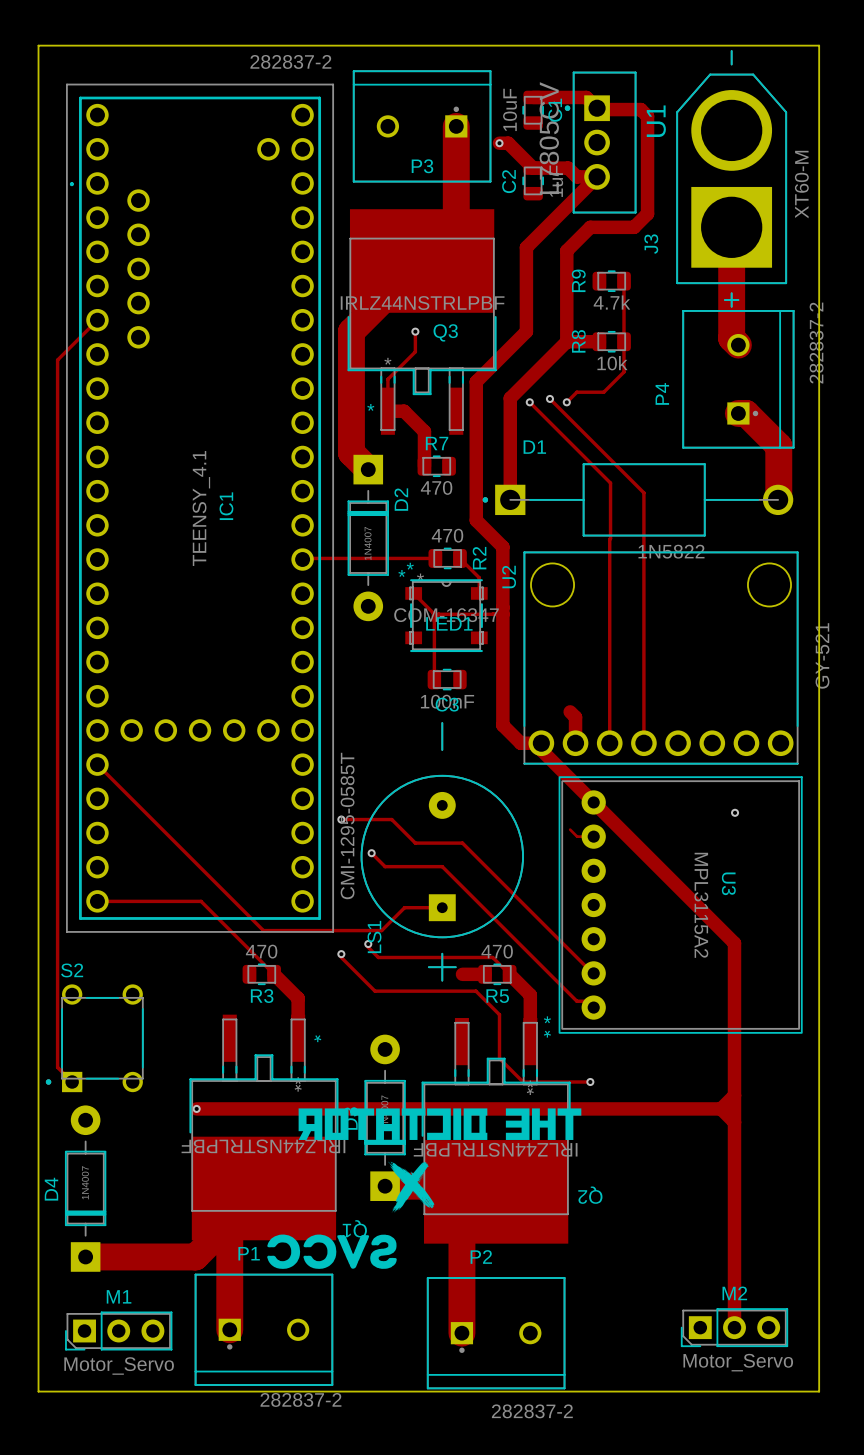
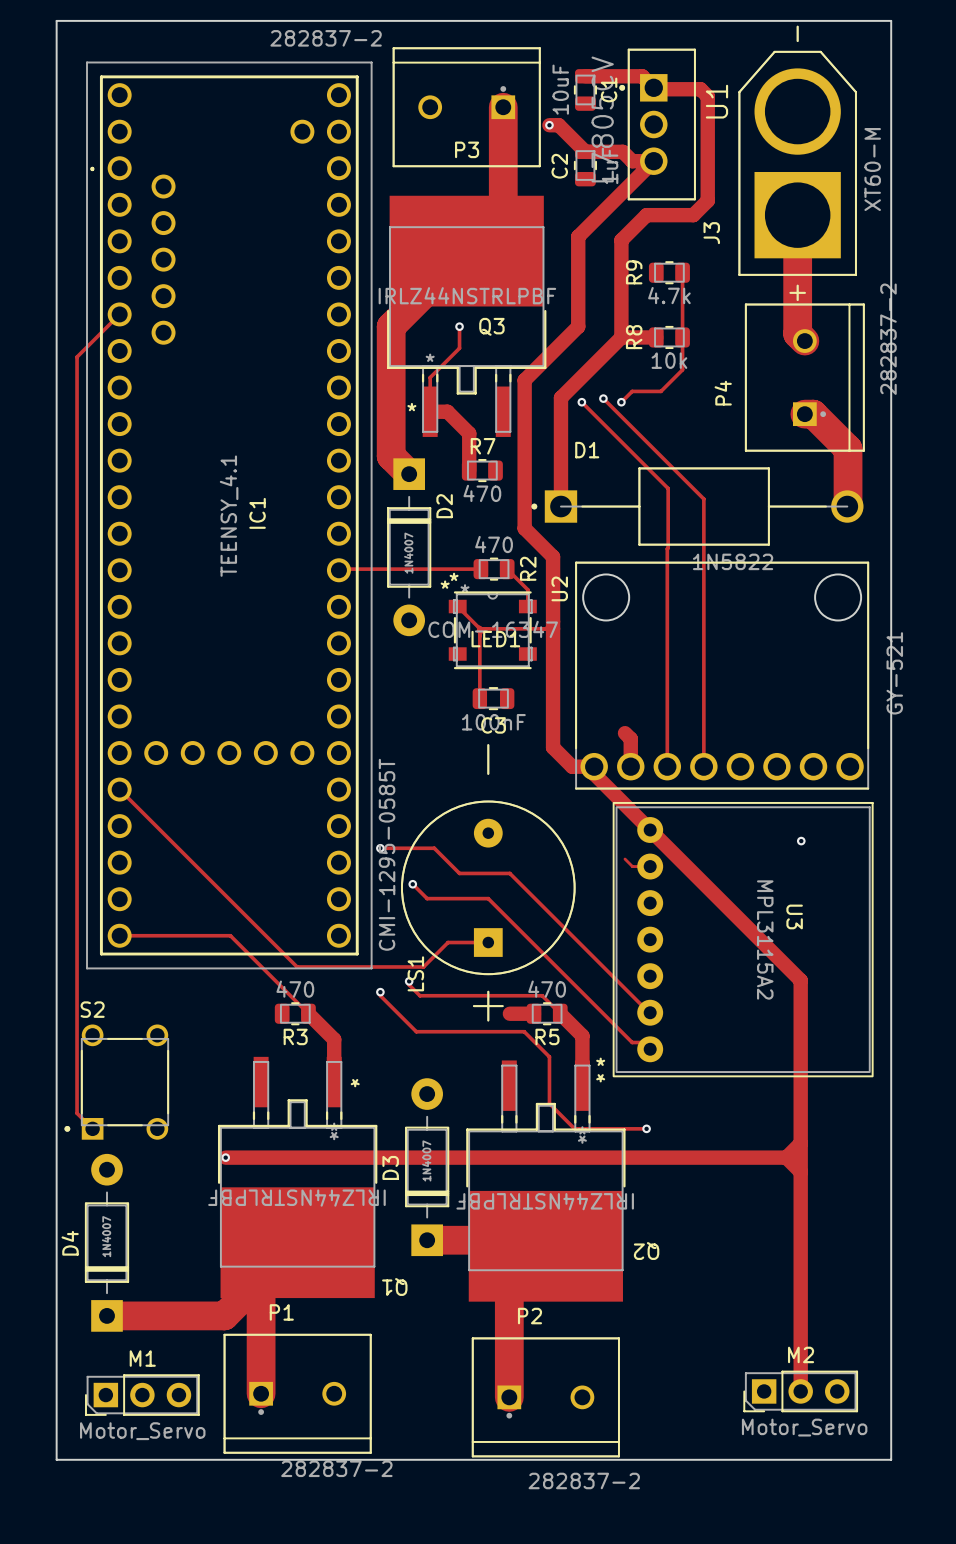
drawing: [298, 1108, 488, 1140] -> none
drawing: [505, 1108, 582, 1140] -> none
drawing: [388, 1161, 435, 1213] -> none
drawing: [267, 1234, 397, 1269] -> none

